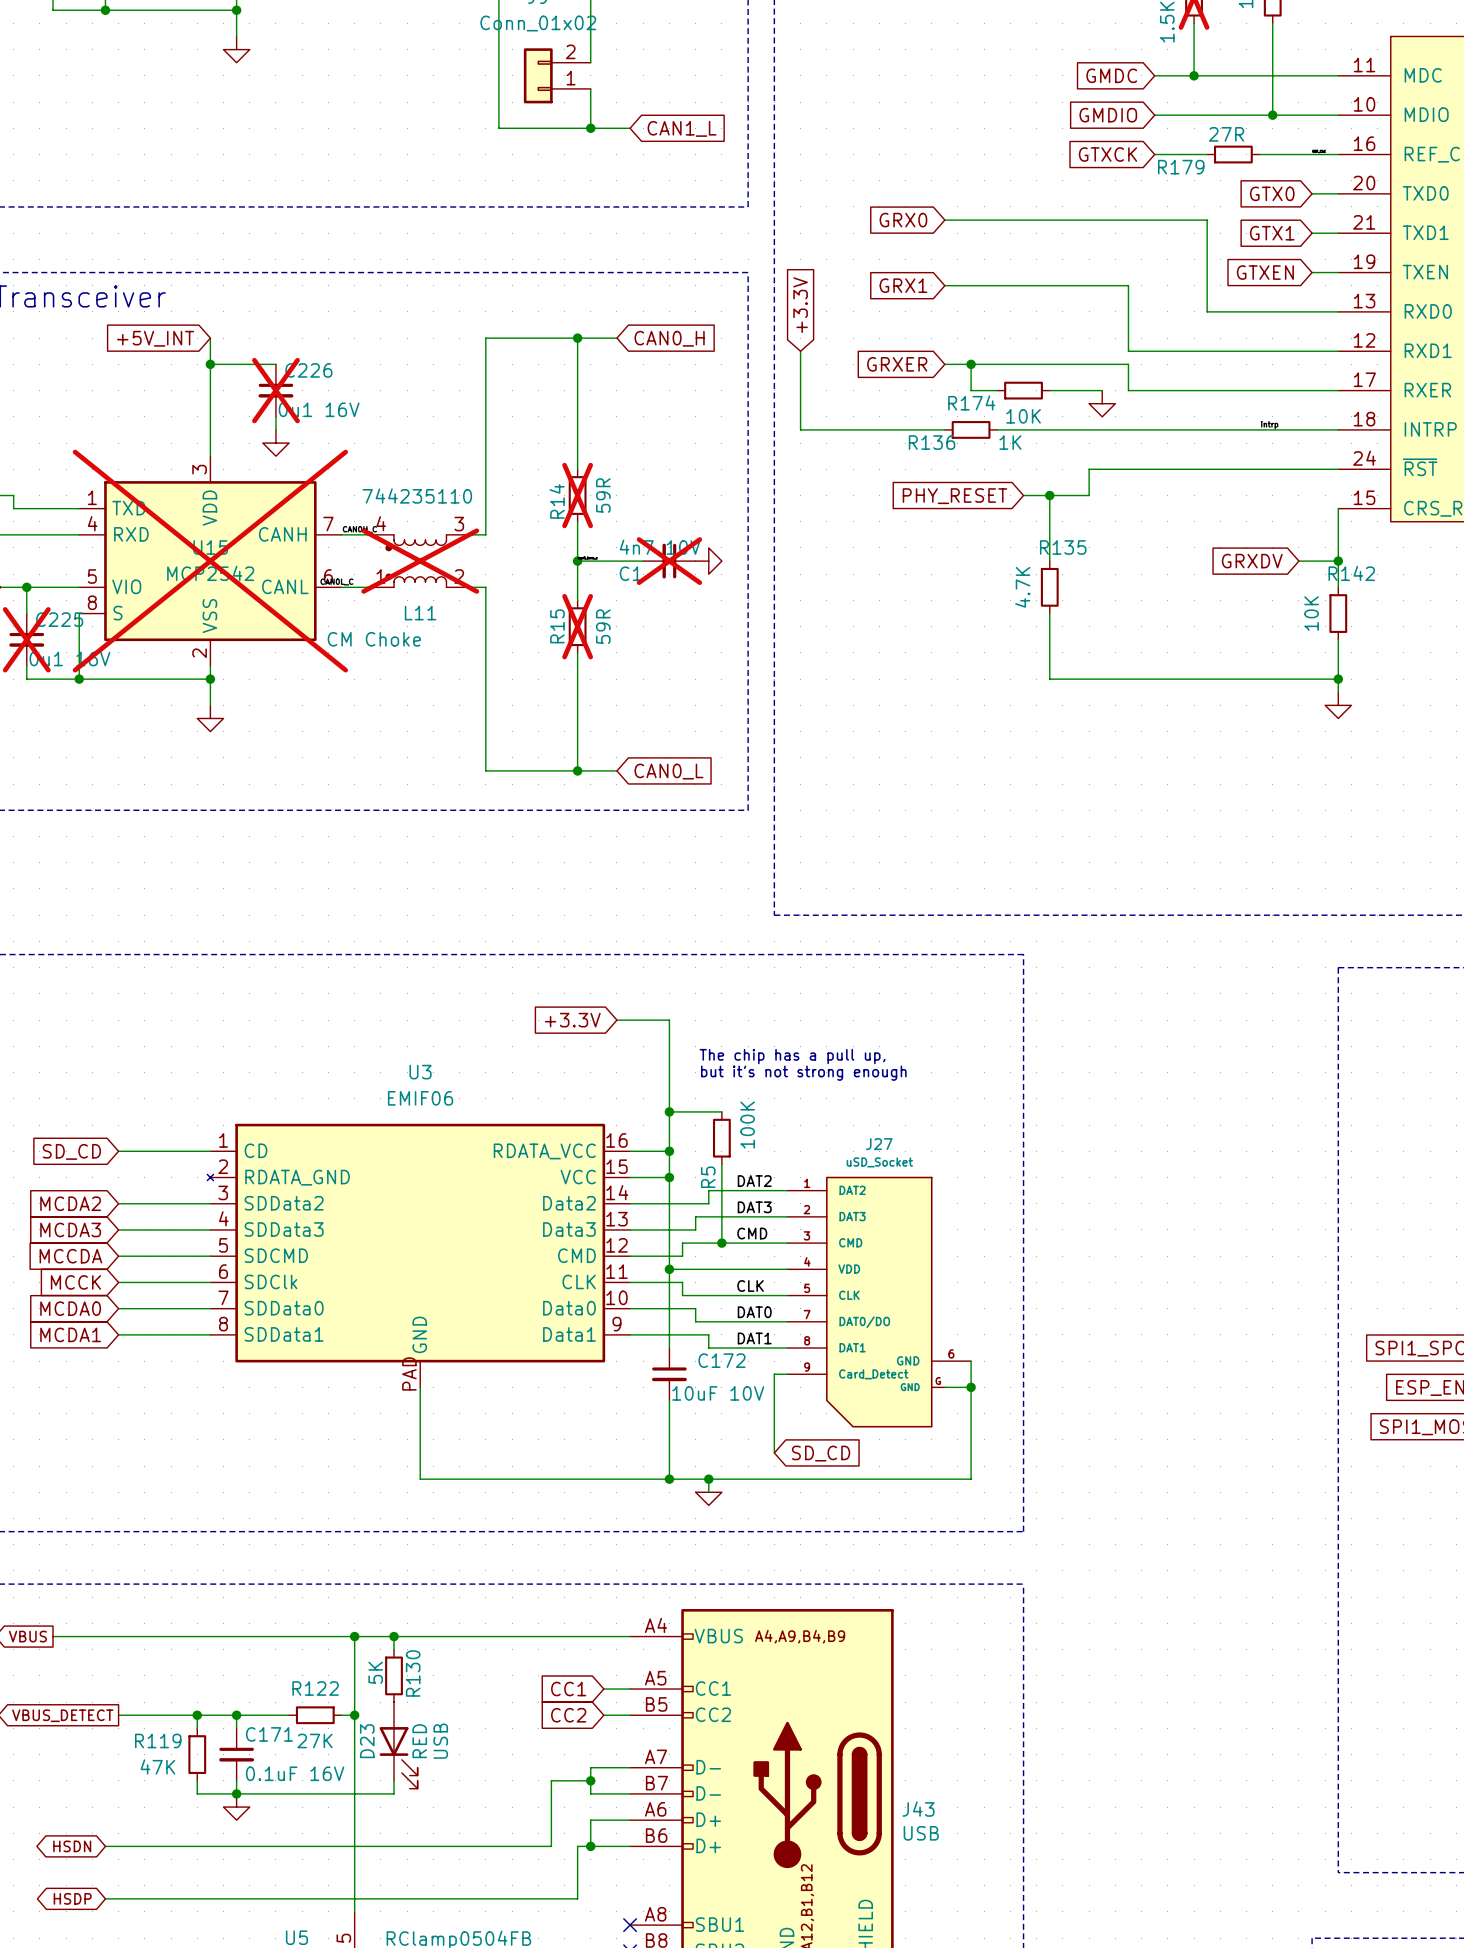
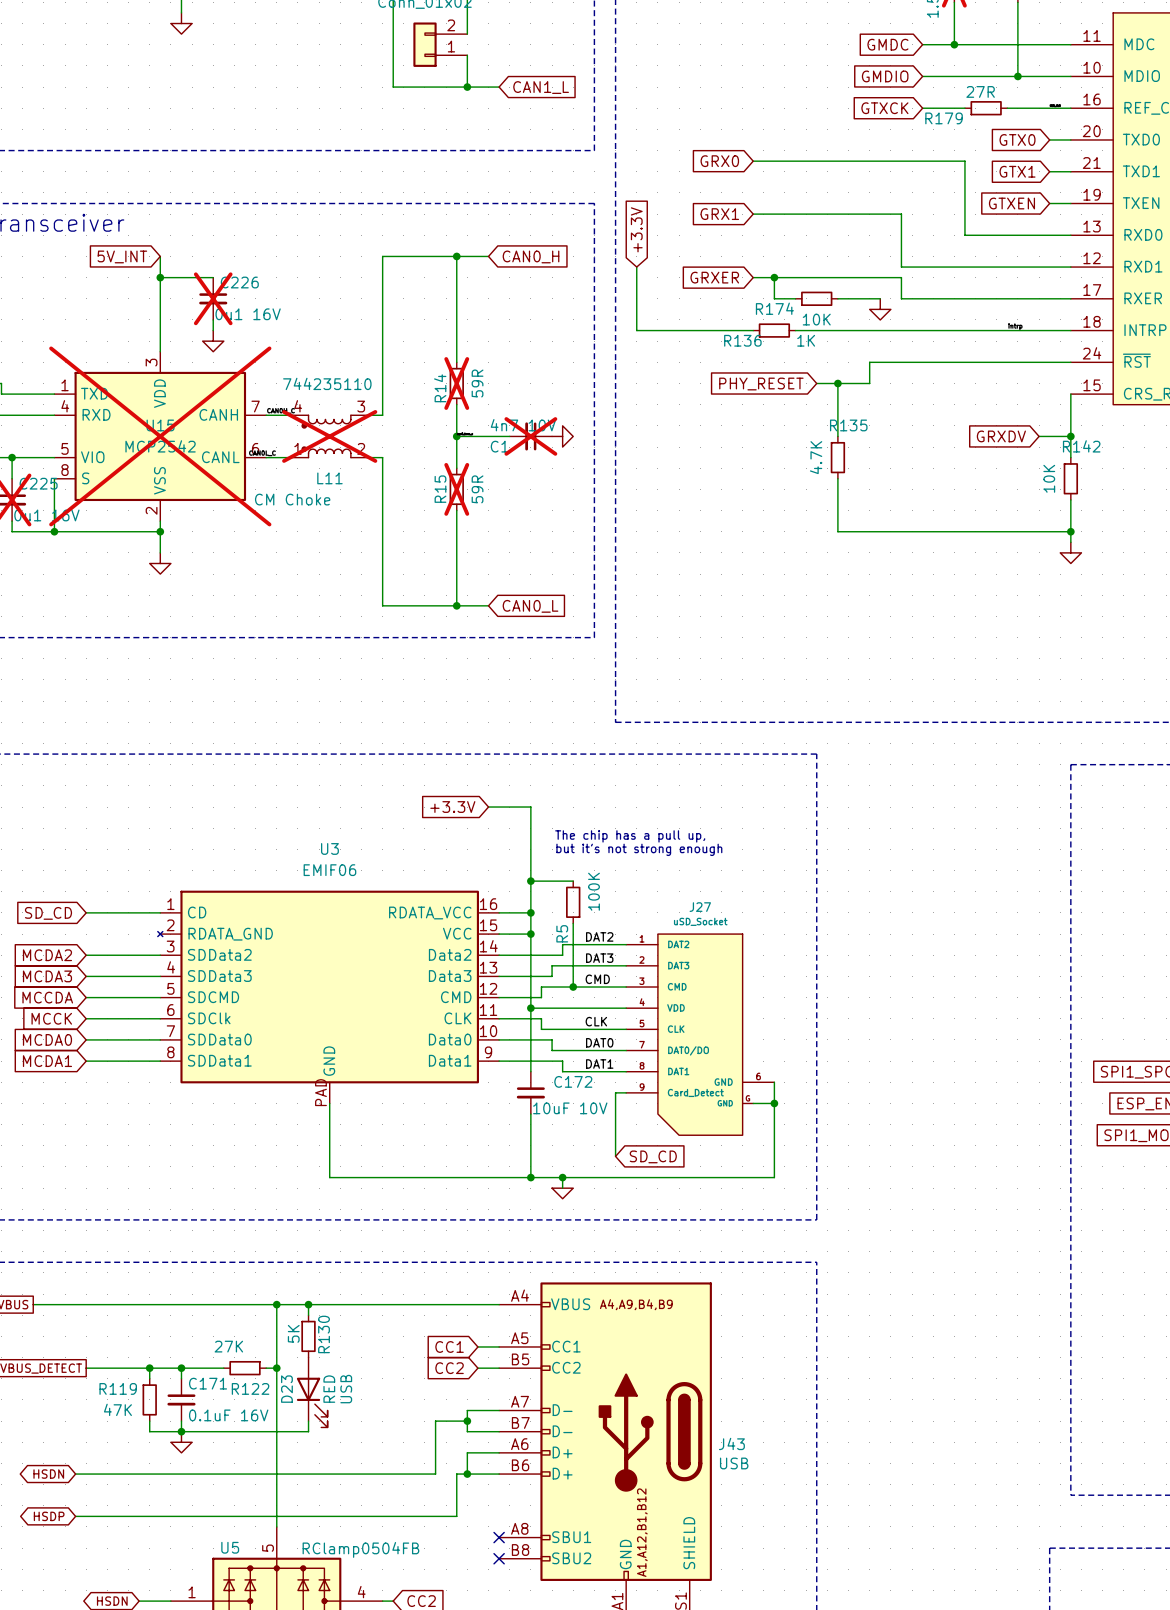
global label: +5V_INT (155, 338) -> 5V_INT (122, 256)
R122 name position: R122 (315, 1688) -> R122 (250, 1388)
R122 value position: 27K (315, 1740) -> 27K (228, 1346)

